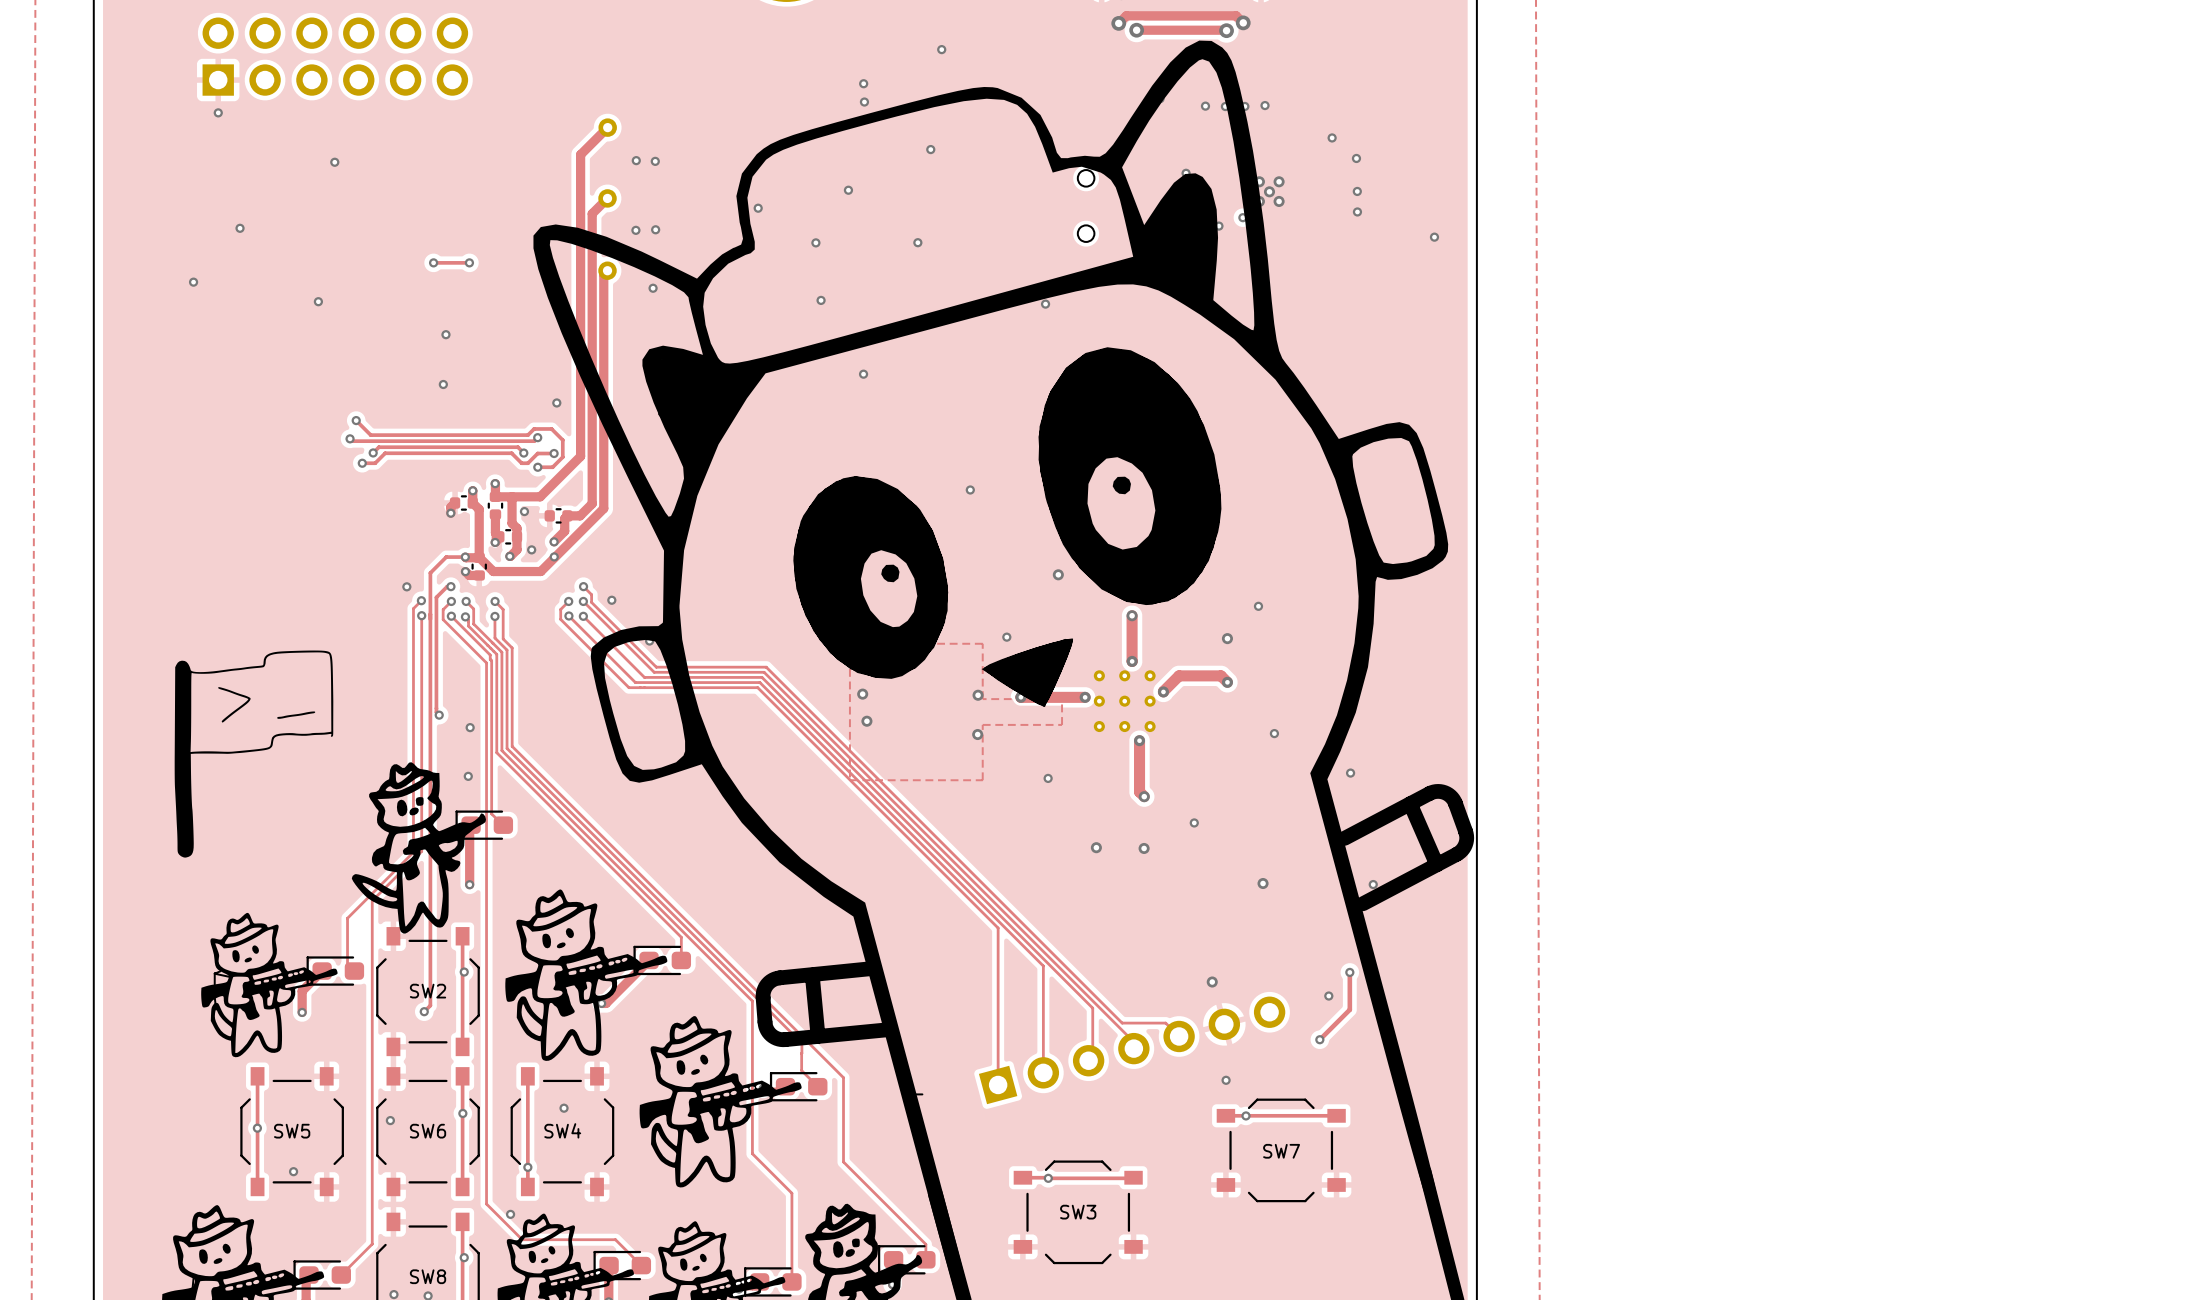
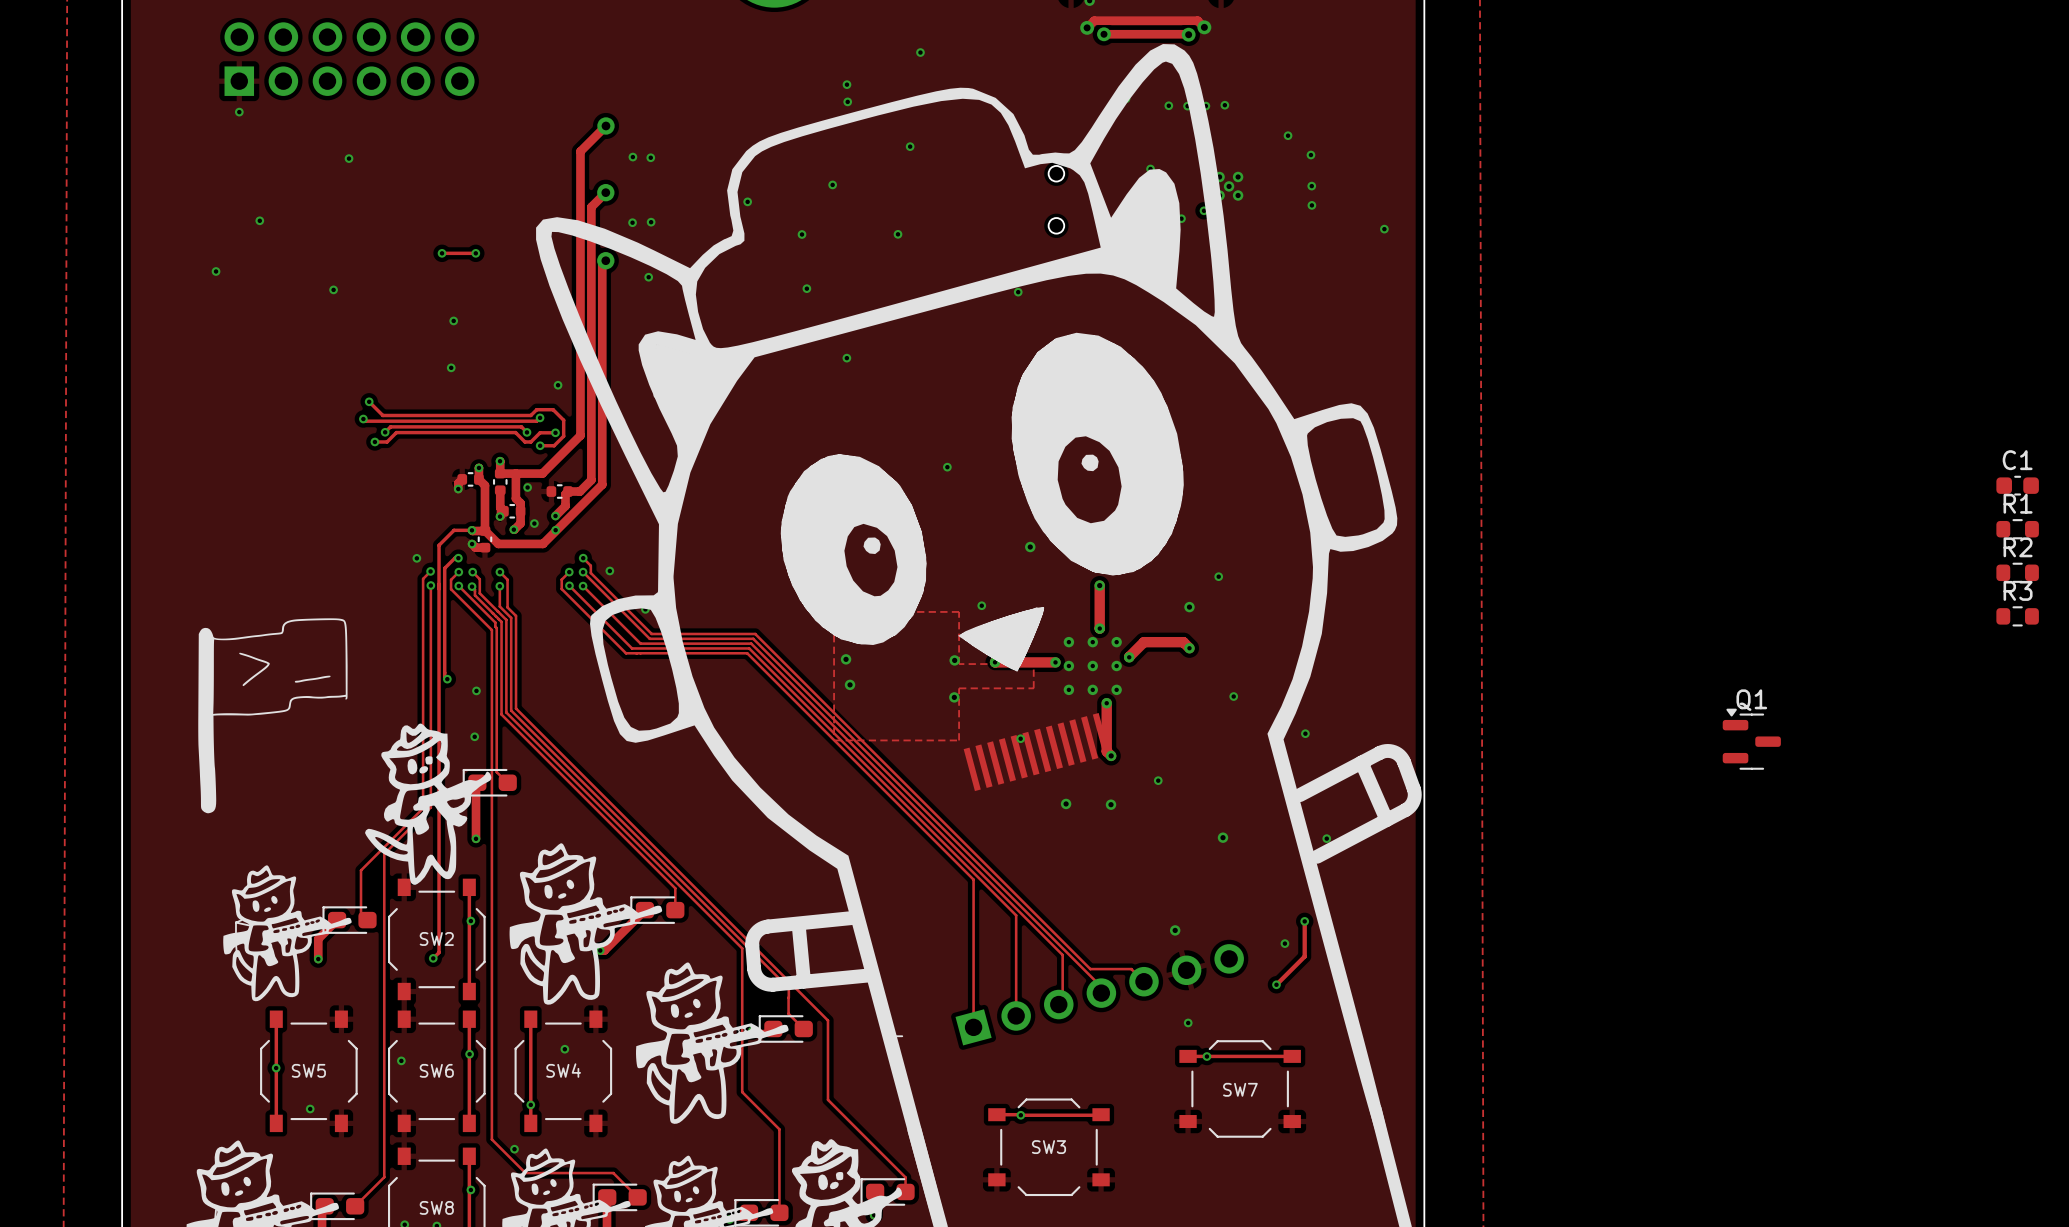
C1: none -> (2017, 485)
R1: none -> (2017, 529)
R2: none -> (2017, 572)
R3: none -> (2017, 616)
Q1: none -> (1751, 739)
part: none -> (1036, 752)

